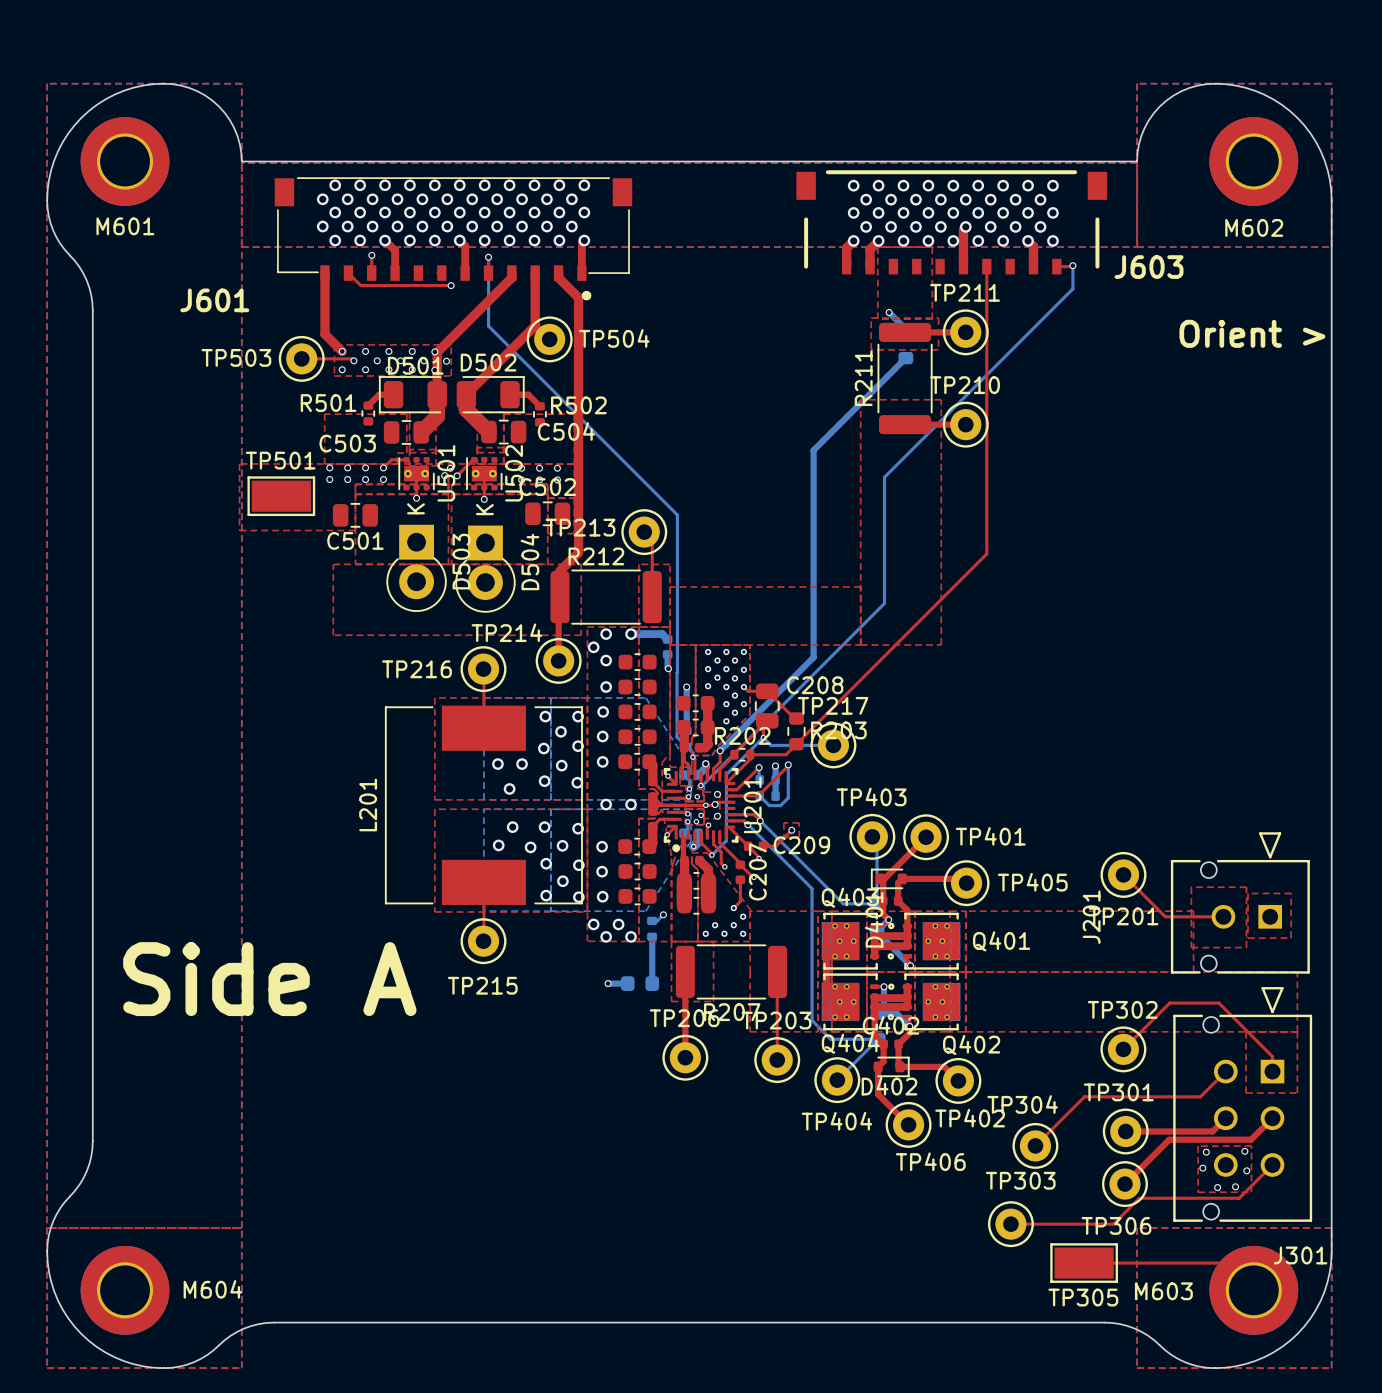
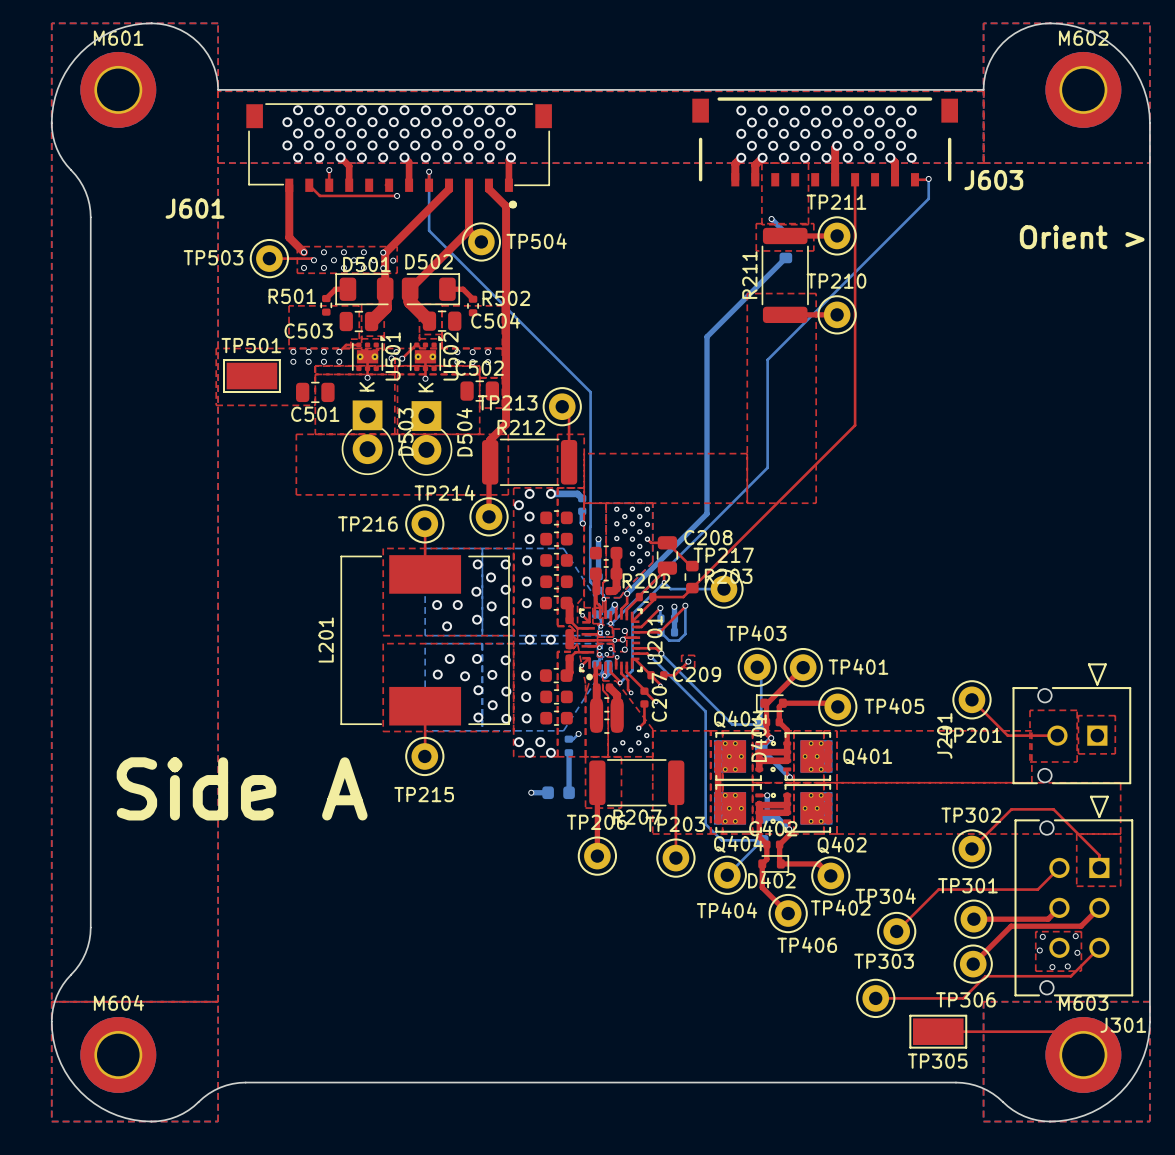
M601 name position: M601 (125, 226) -> M601 (118, 38)
M602 name position: M602 (1254, 227) -> M602 (1083, 38)
U501 footprint: [398, 456, 435, 491] -> [351, 335, 386, 372]
U502 footprint: [466, 456, 503, 491] -> [409, 335, 444, 372]
U201 footprint: [663, 767, 739, 853] -> [578, 608, 643, 681]
M604 name position: M604 (212, 1289) -> M604 (118, 1002)
M603 name position: M603 (1163, 1291) -> M603 (1083, 1003)

